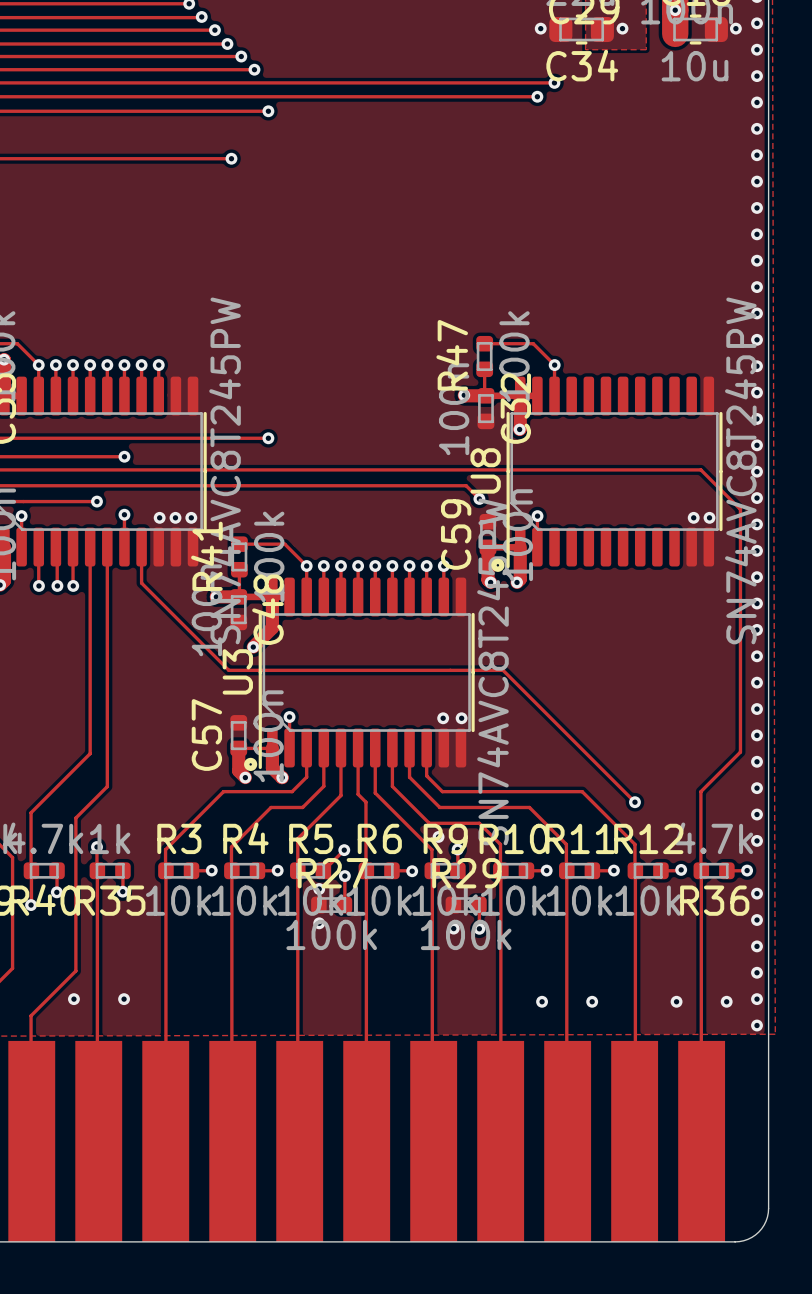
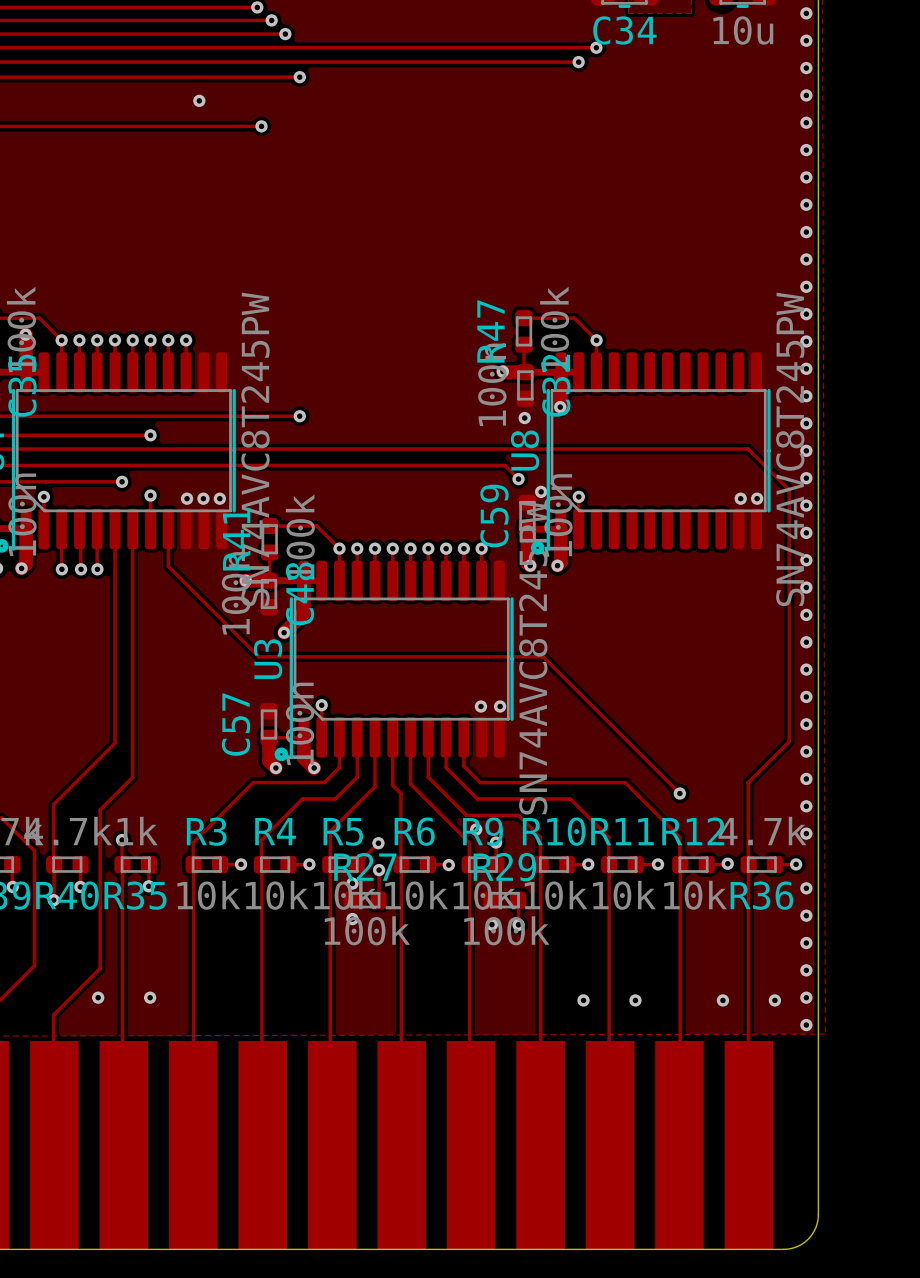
via: none -> (199, 100)
via: none -> (524, 418)
via: none -> (541, 491)

